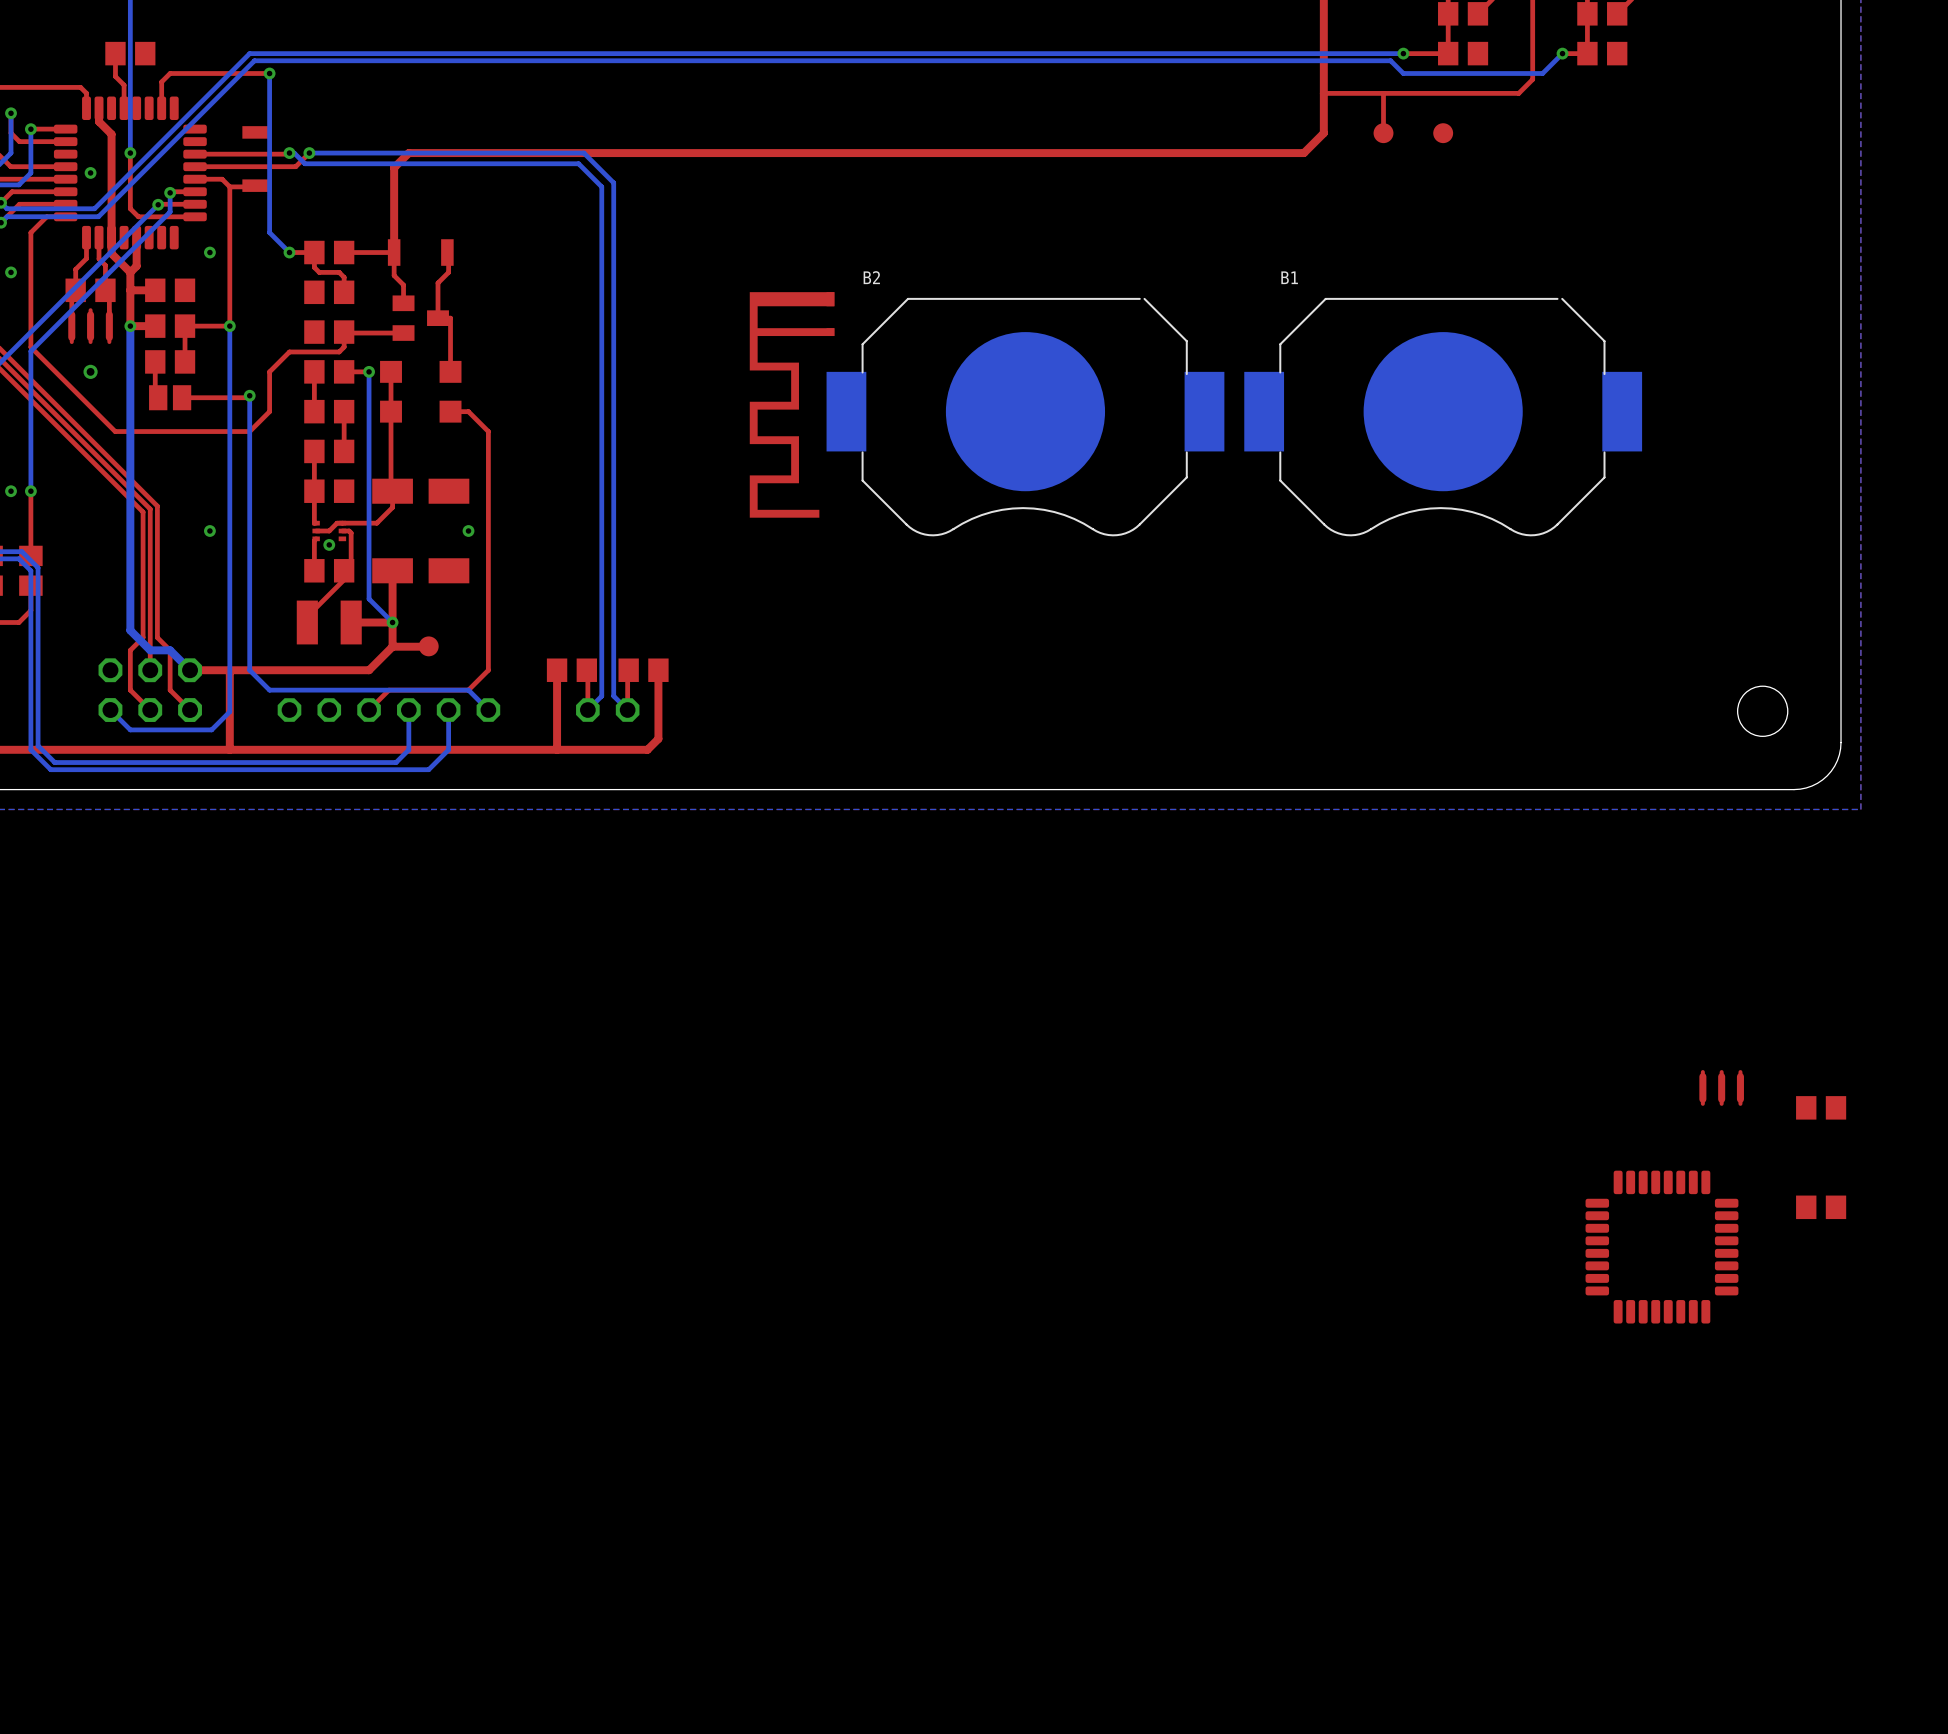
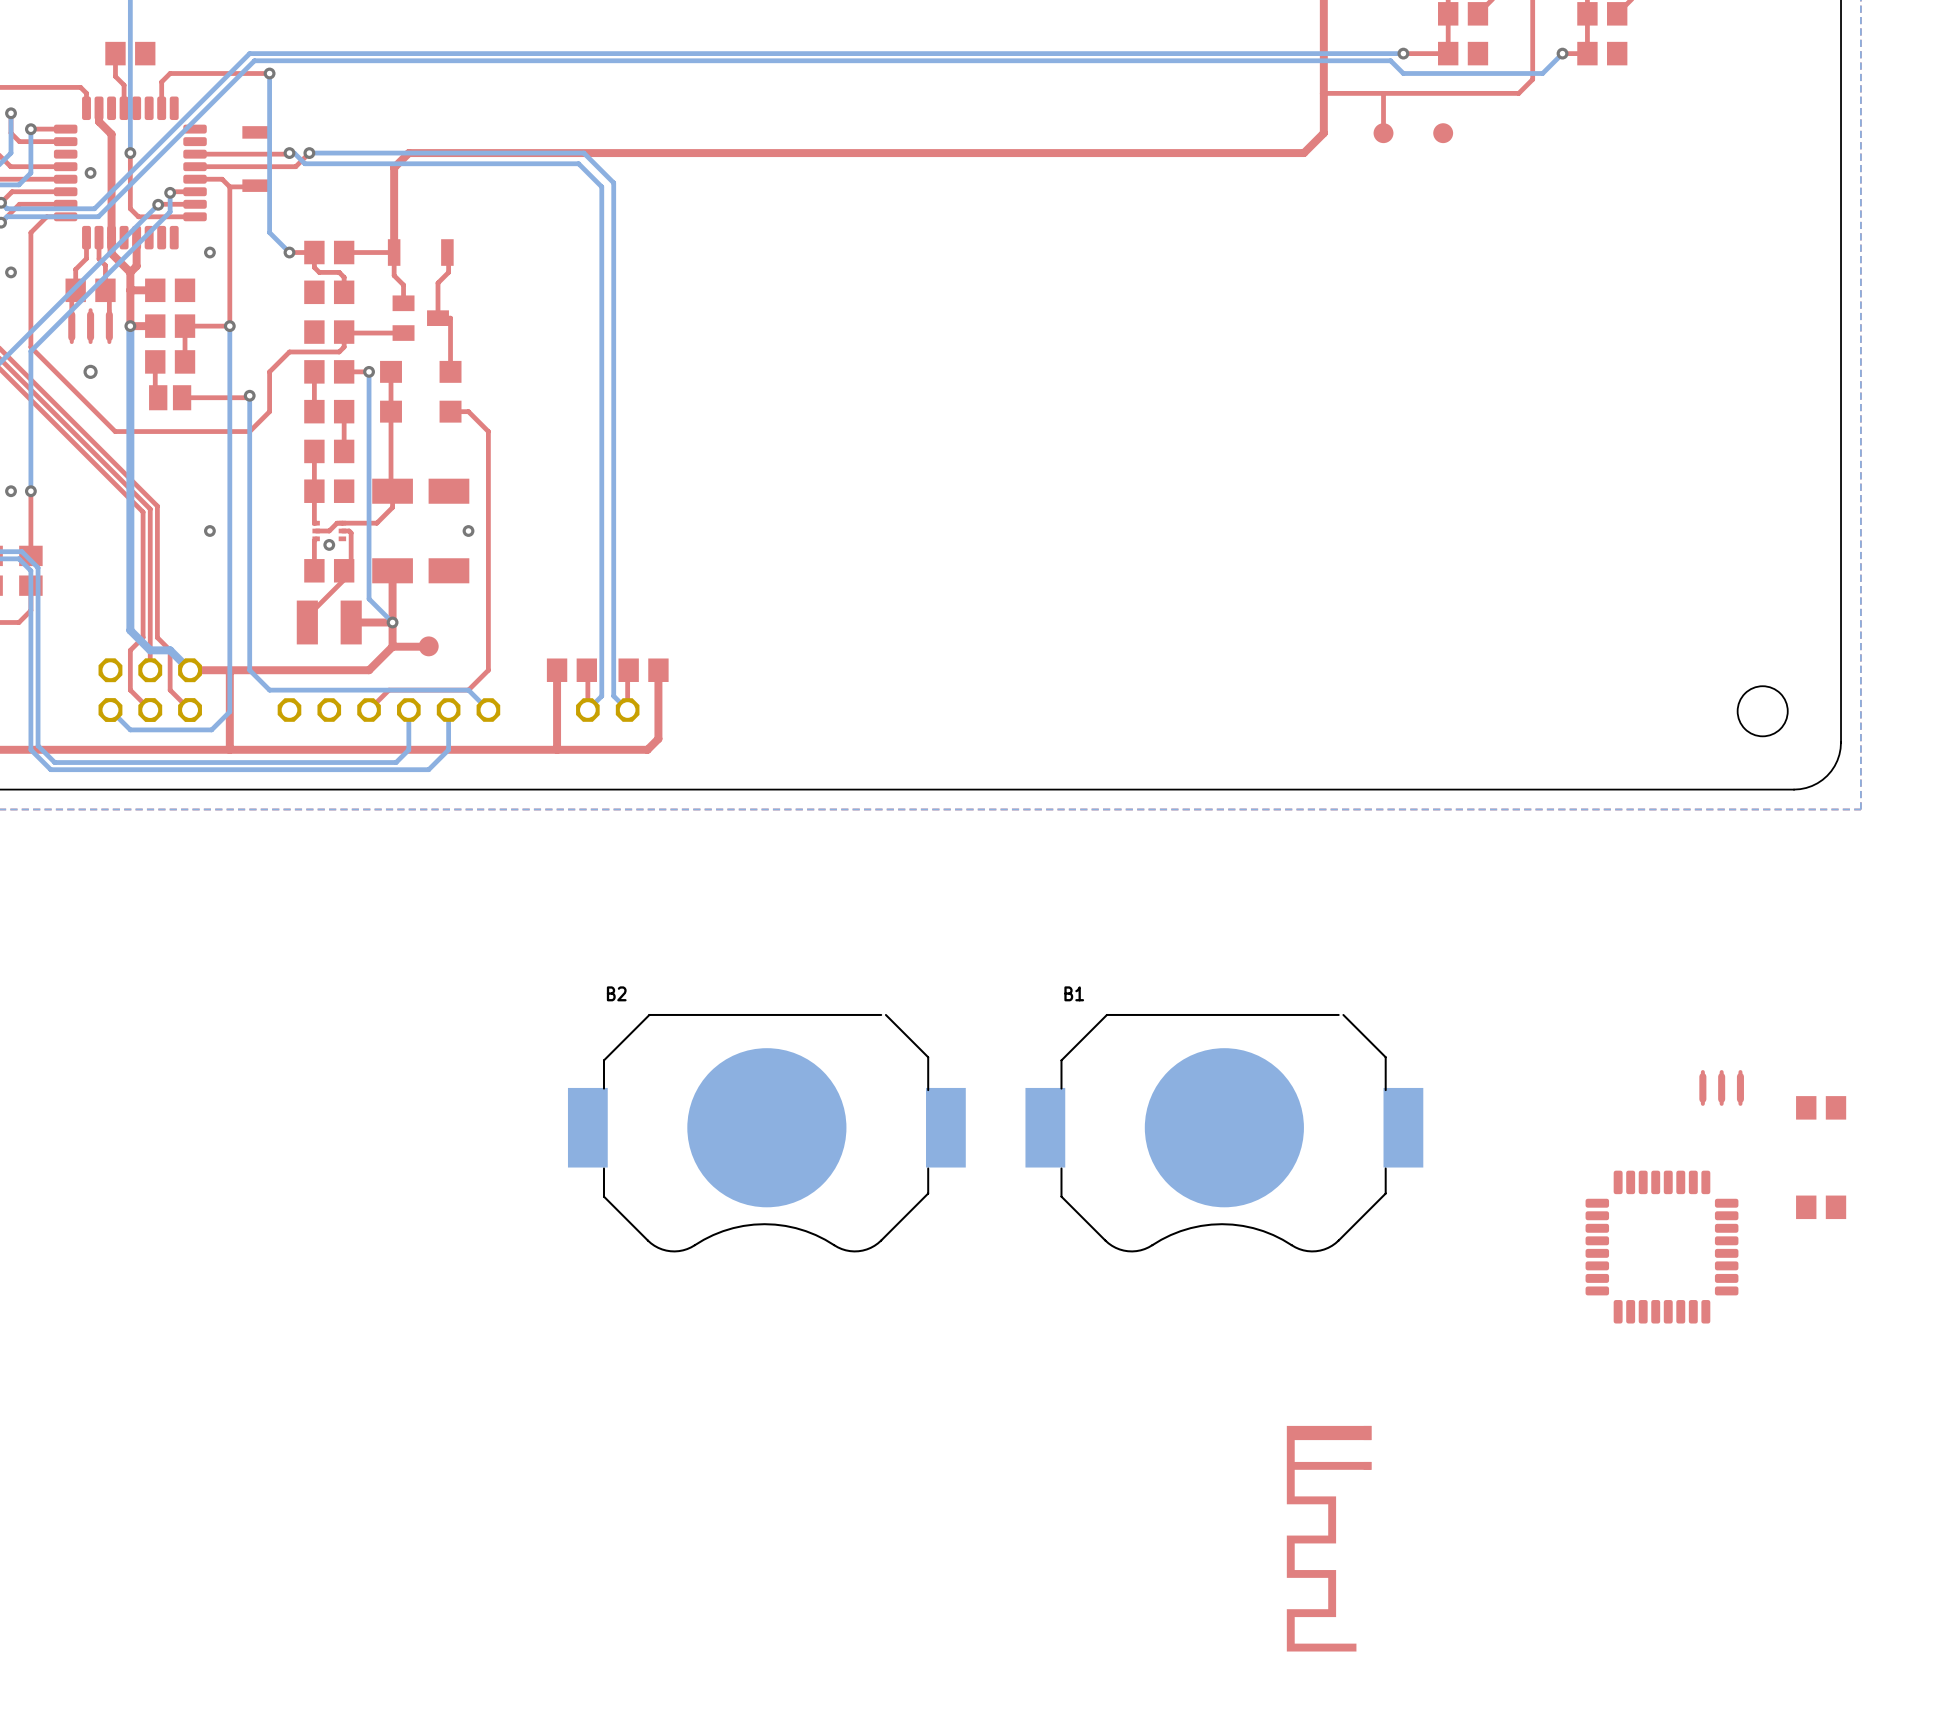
part: (792, 404) -> none
B2 position: (1025, 417) -> (766, 1133)
B1 position: (1443, 417) -> (1224, 1133)
part: none -> (1329, 1538)

